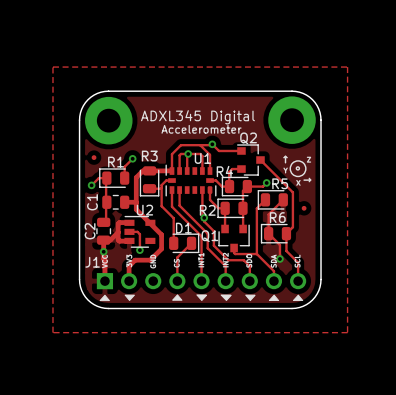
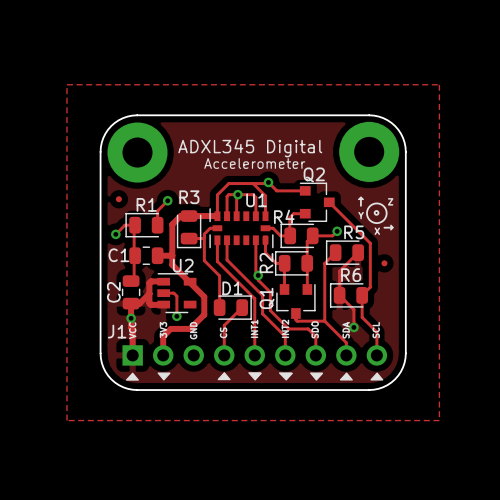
C1 name rotation: 0° (92, 202) -> 90° clockwise (118, 255)
R2 name rotation: 0° (207, 210) -> 90° counterclockwise (266, 263)
Q1 name rotation: 0° (209, 236) -> 90° counterclockwise (267, 298)

